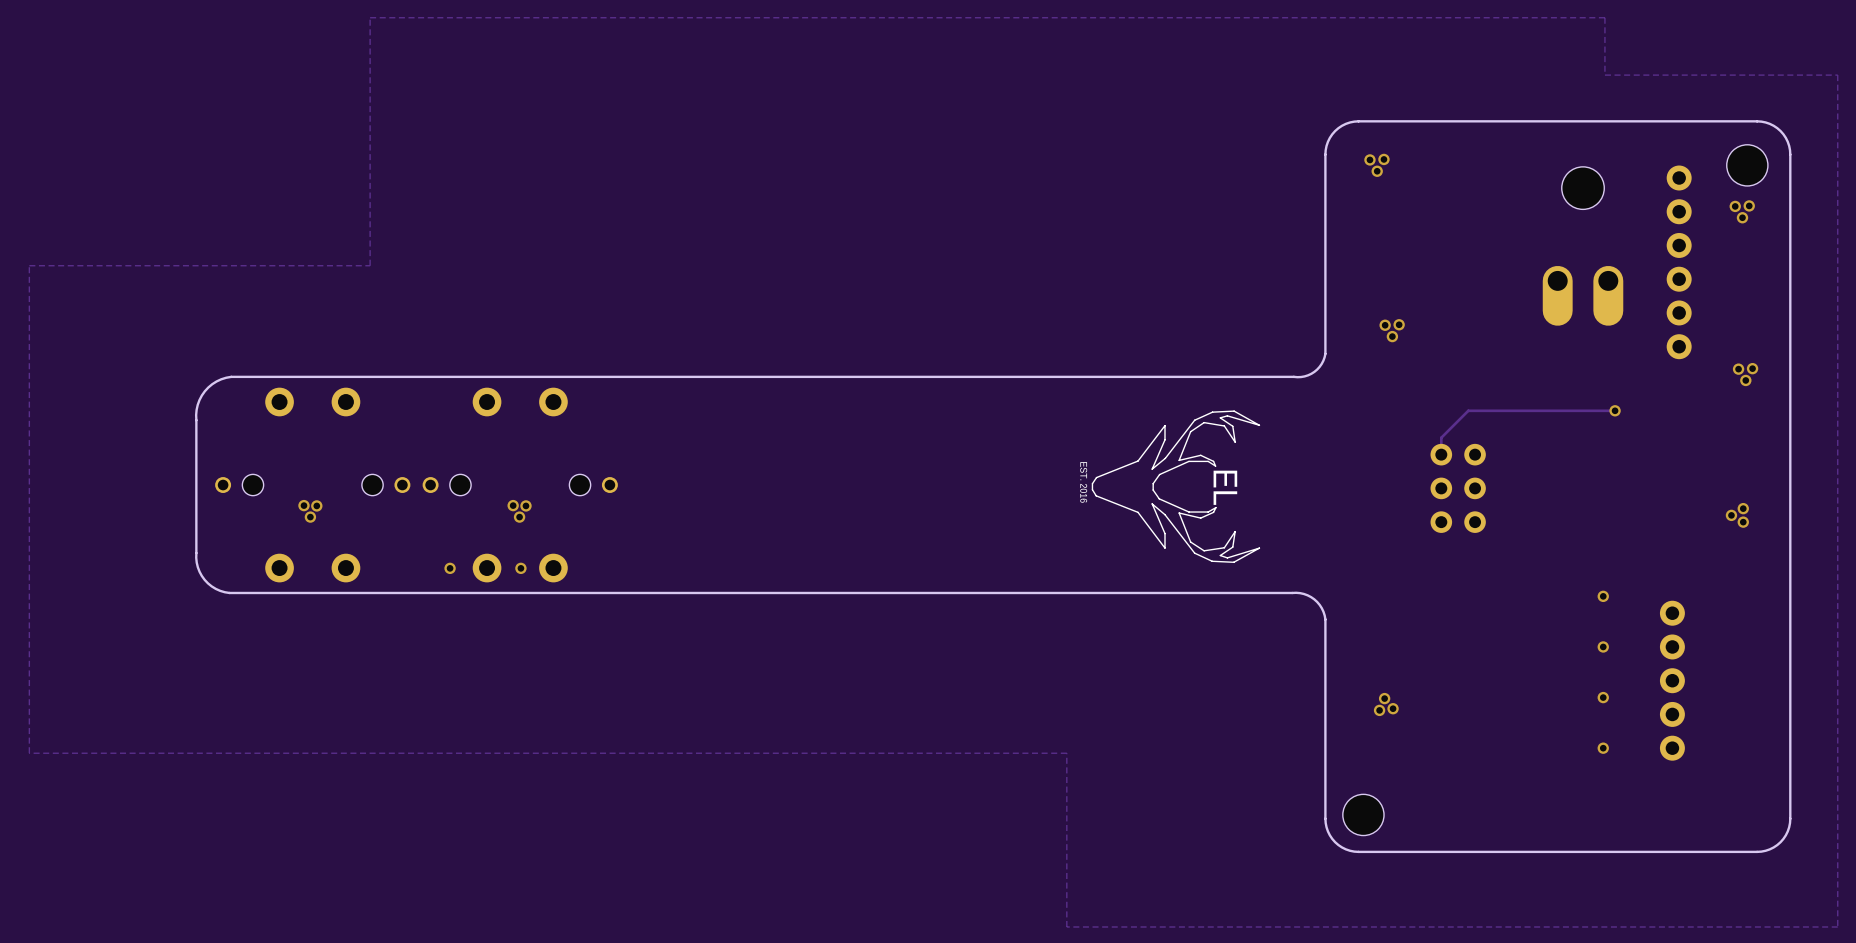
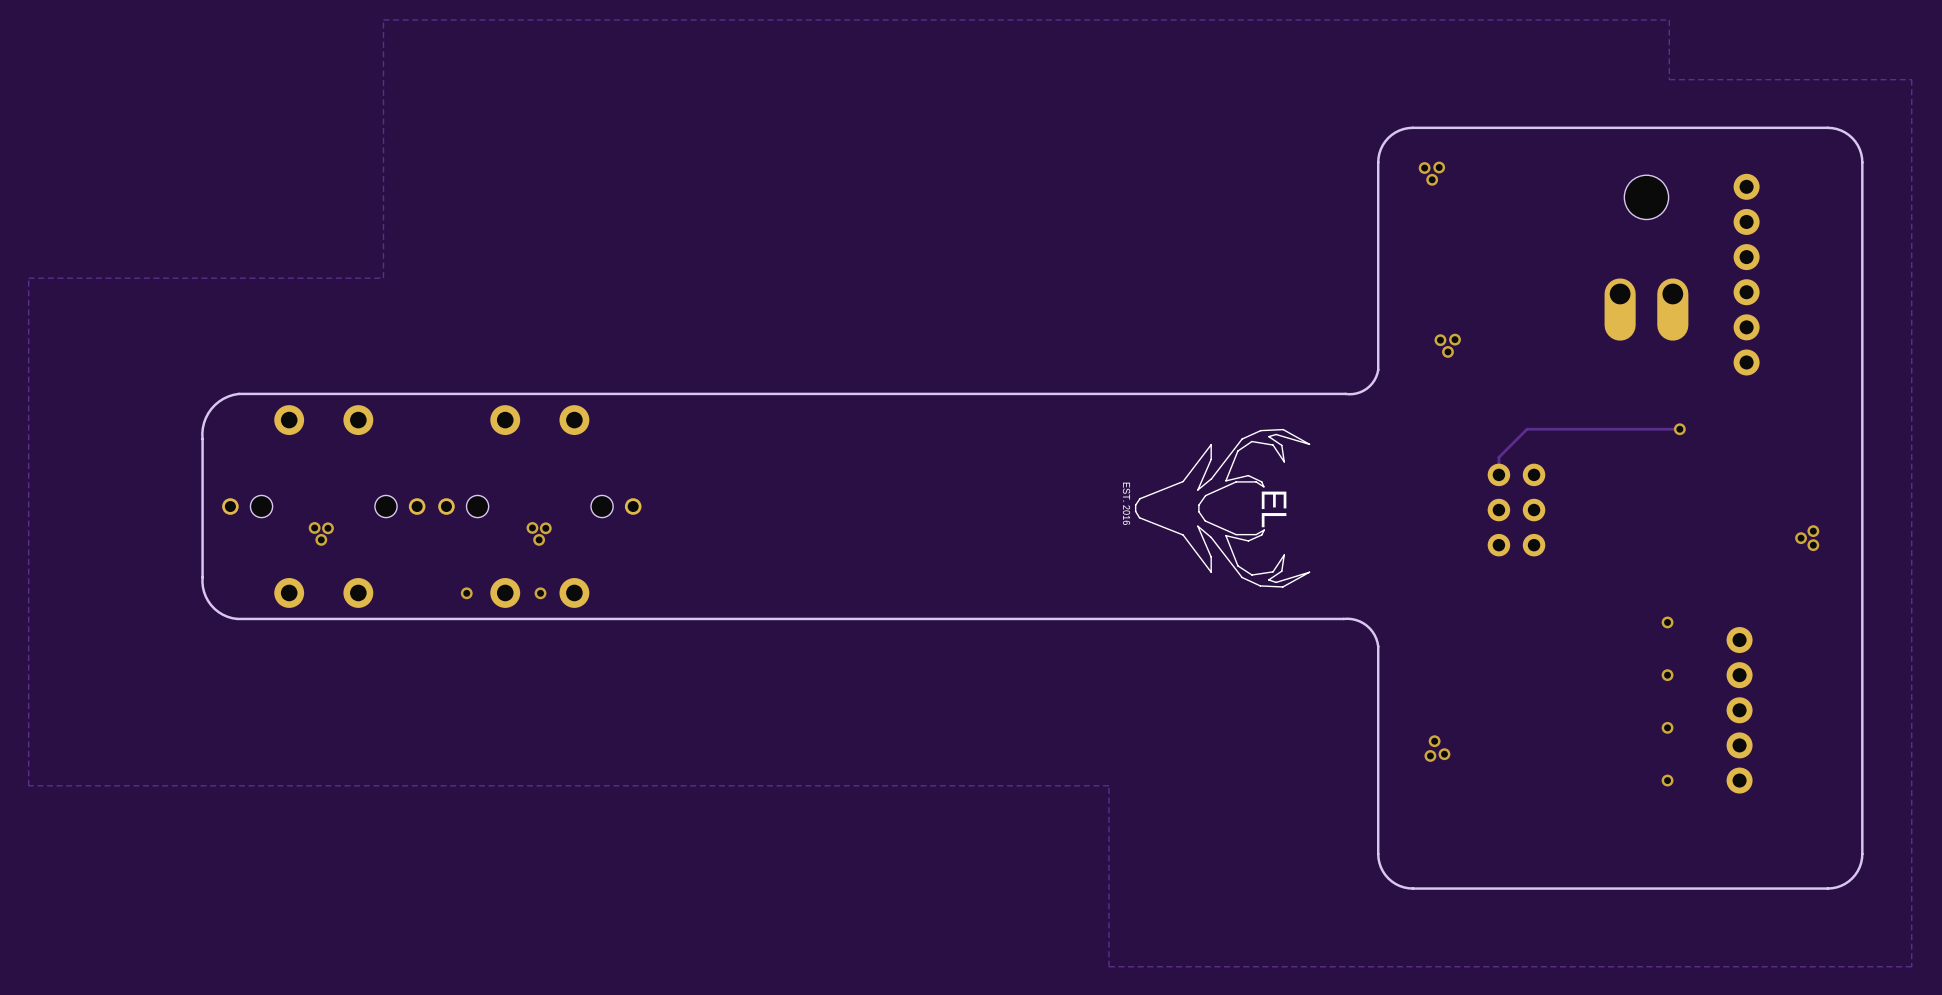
hole: (1747, 165) -> none
via: (1749, 205) -> none
via: (1735, 206) -> none
via: (1742, 217) -> none
via: (1752, 368) -> none
via: (1738, 369) -> none
via: (1745, 380) -> none
via: (1384, 698) -> none
via: (1393, 708) -> none
via: none -> (1444, 754)
via: none -> (1430, 755)
hole: (1363, 814) -> none

